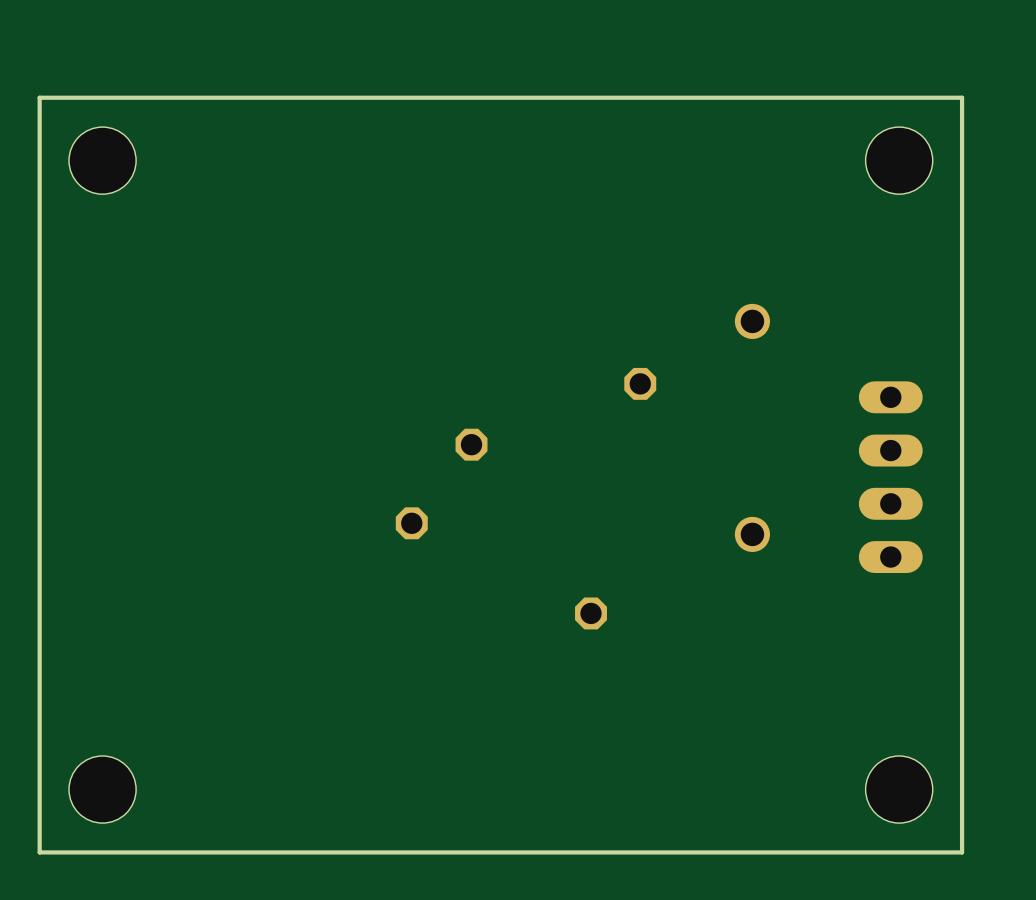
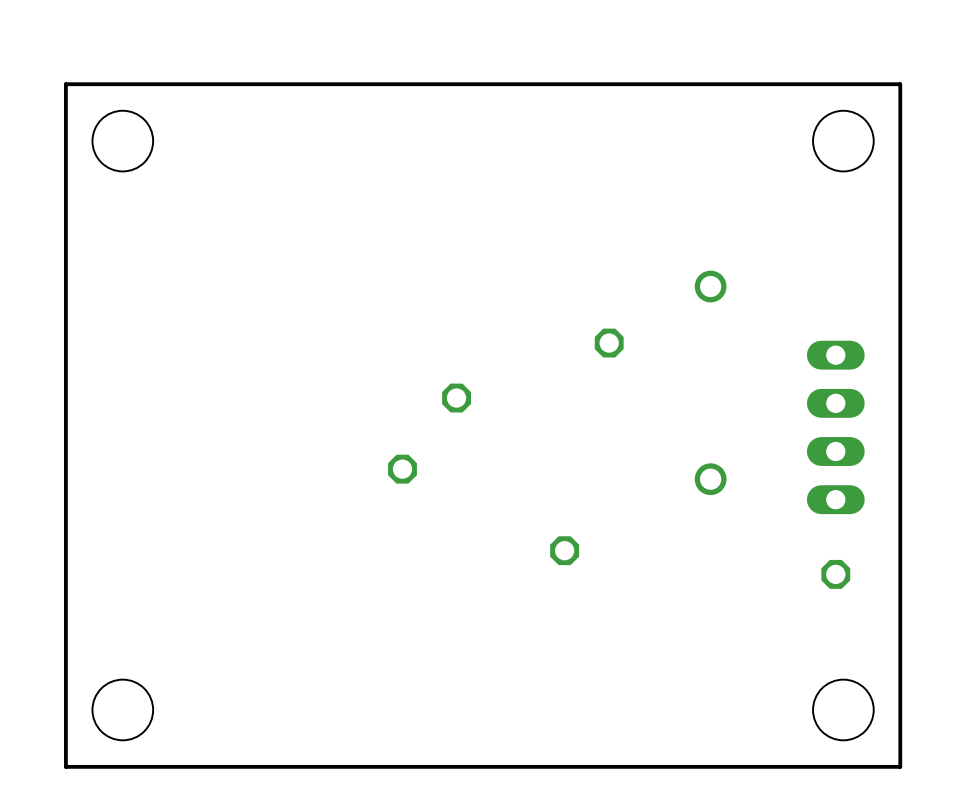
part: none -> (835, 574)

